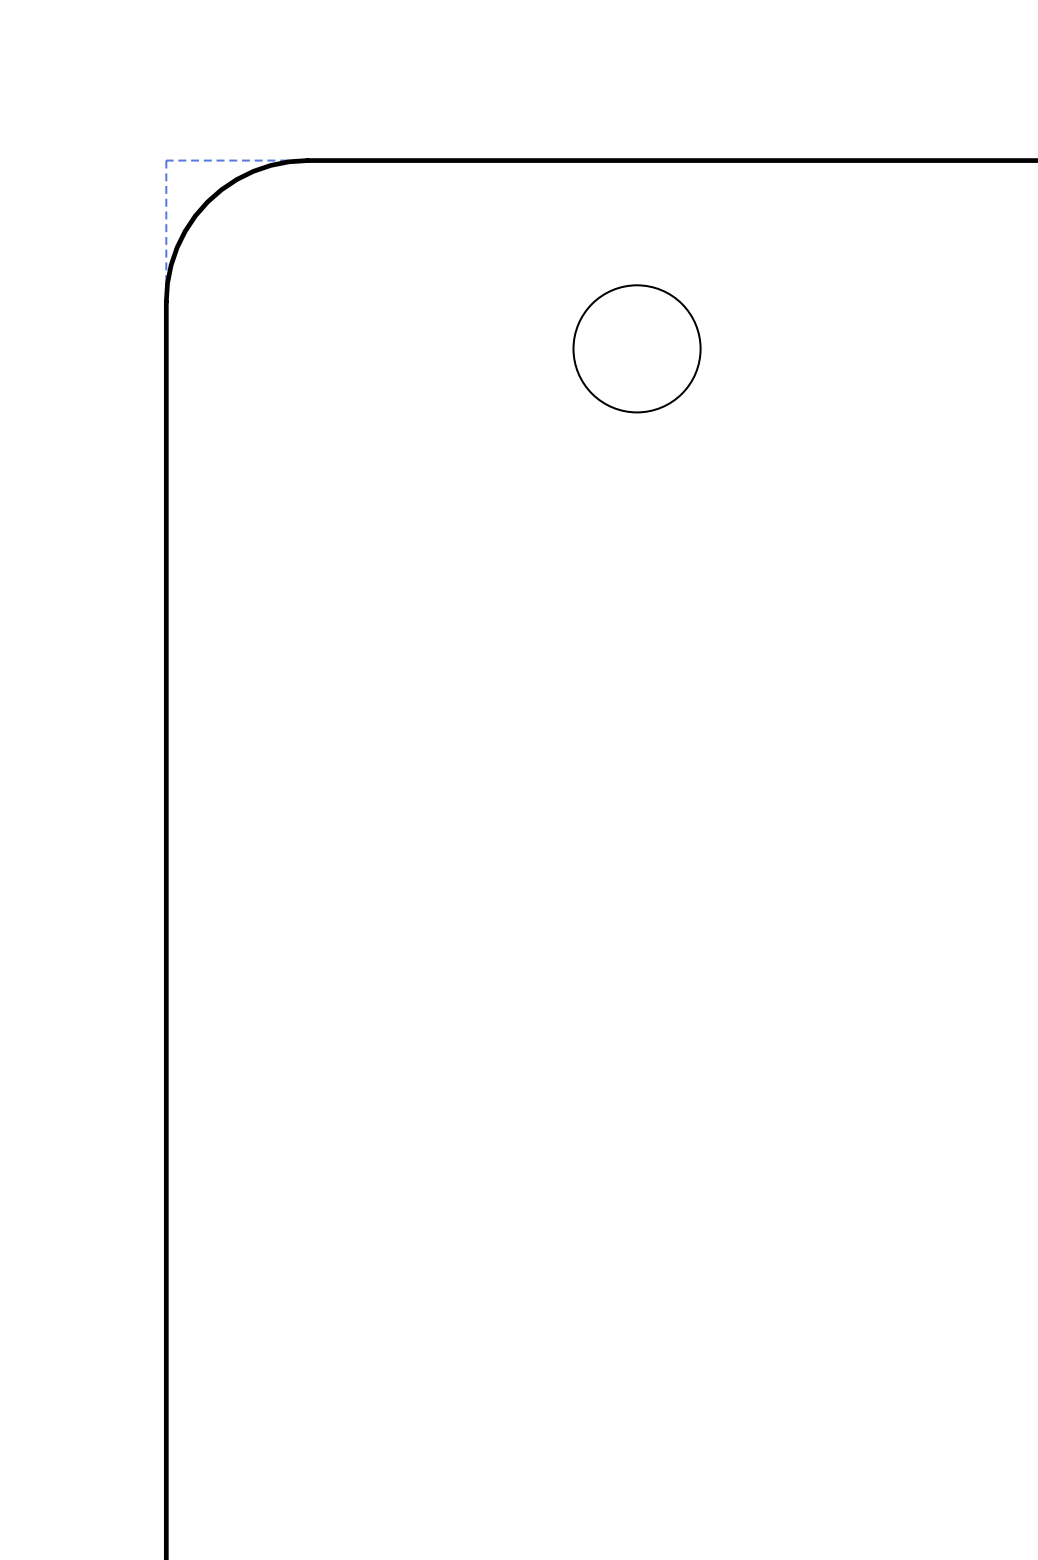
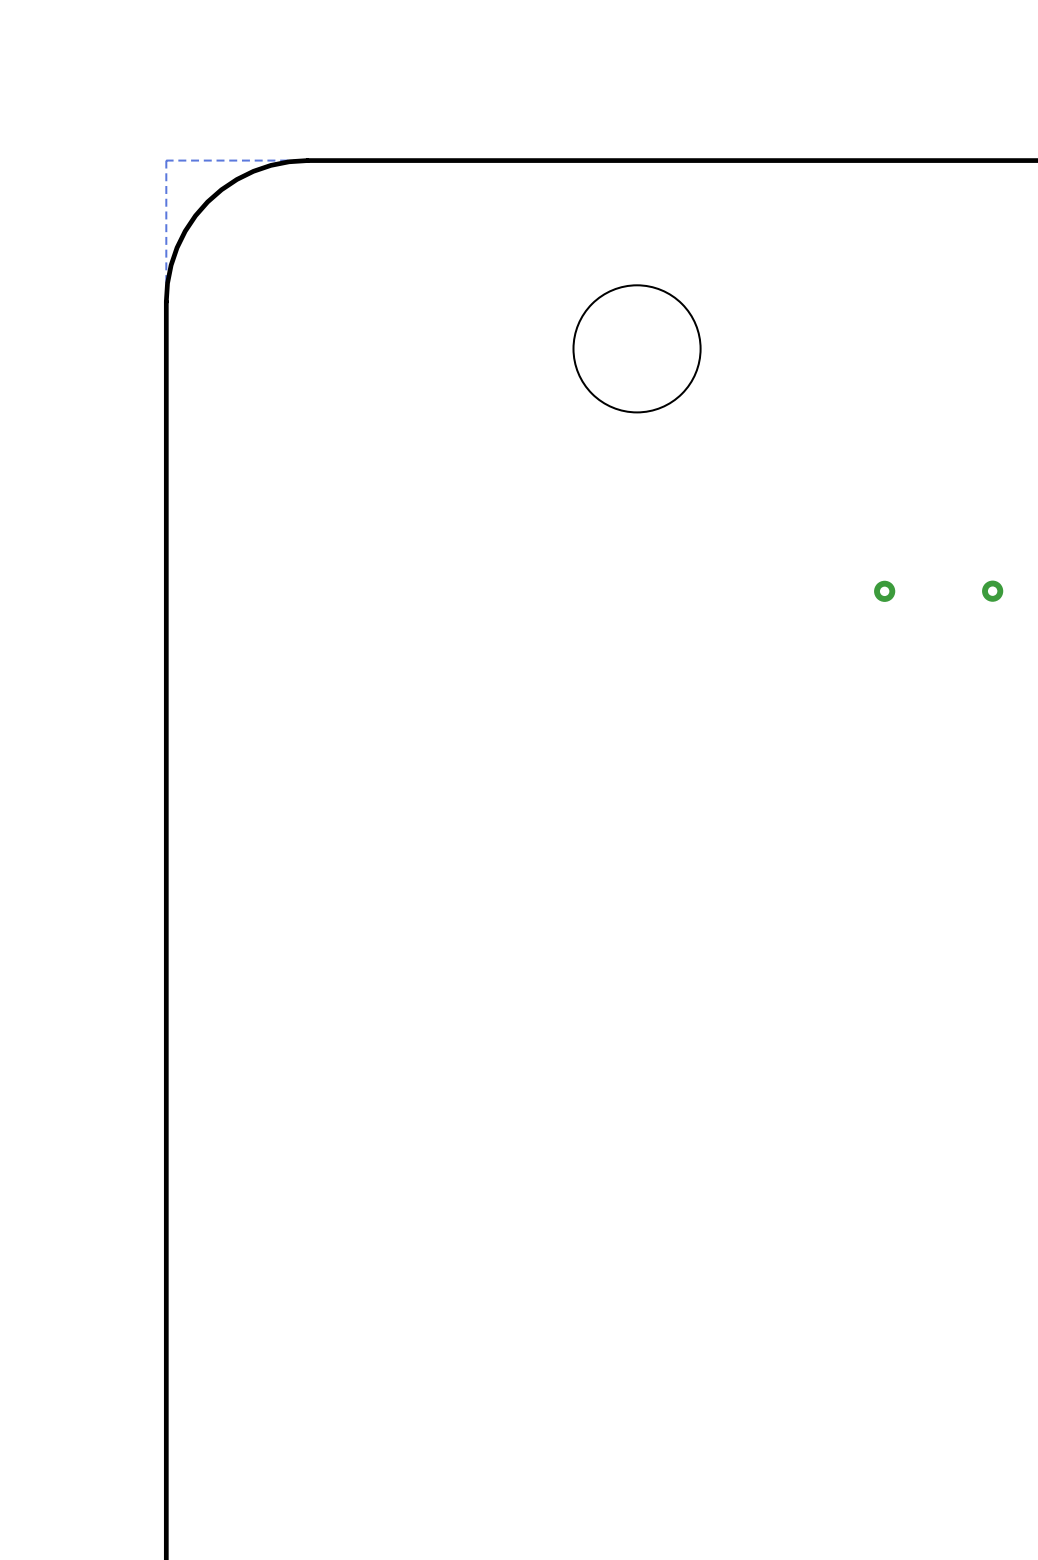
via: none -> (884, 591)
via: none -> (992, 591)

